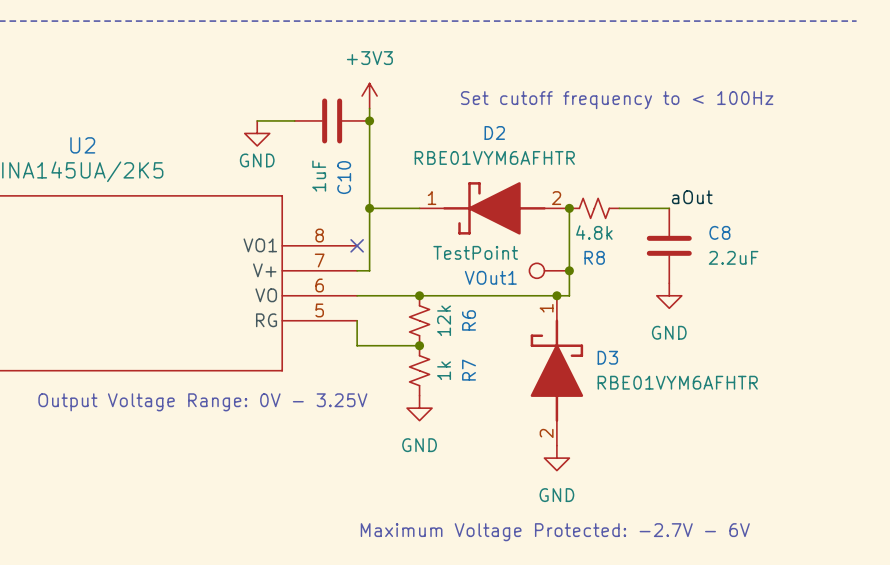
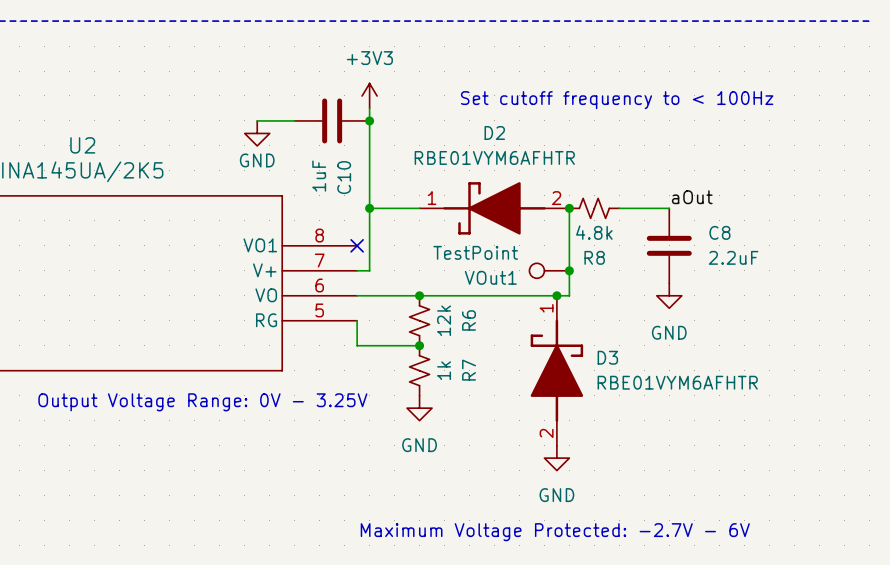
line: none -> (856, 21) (869, 21)

